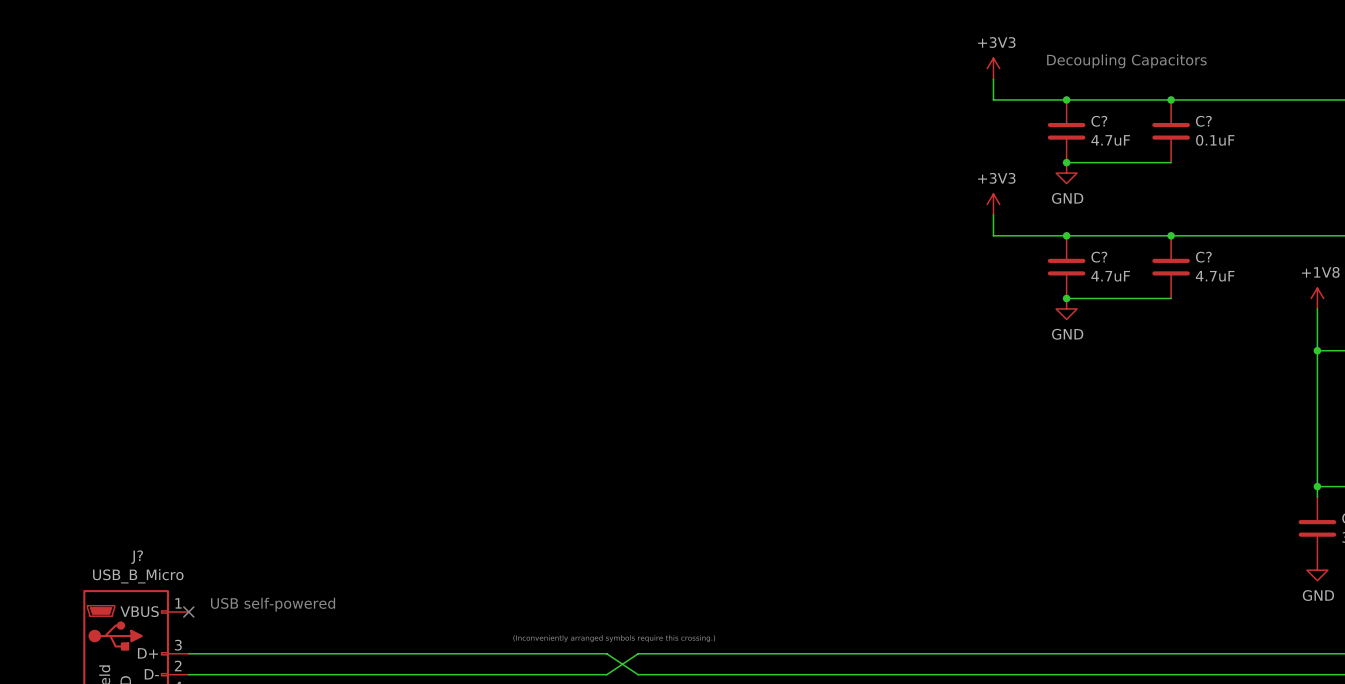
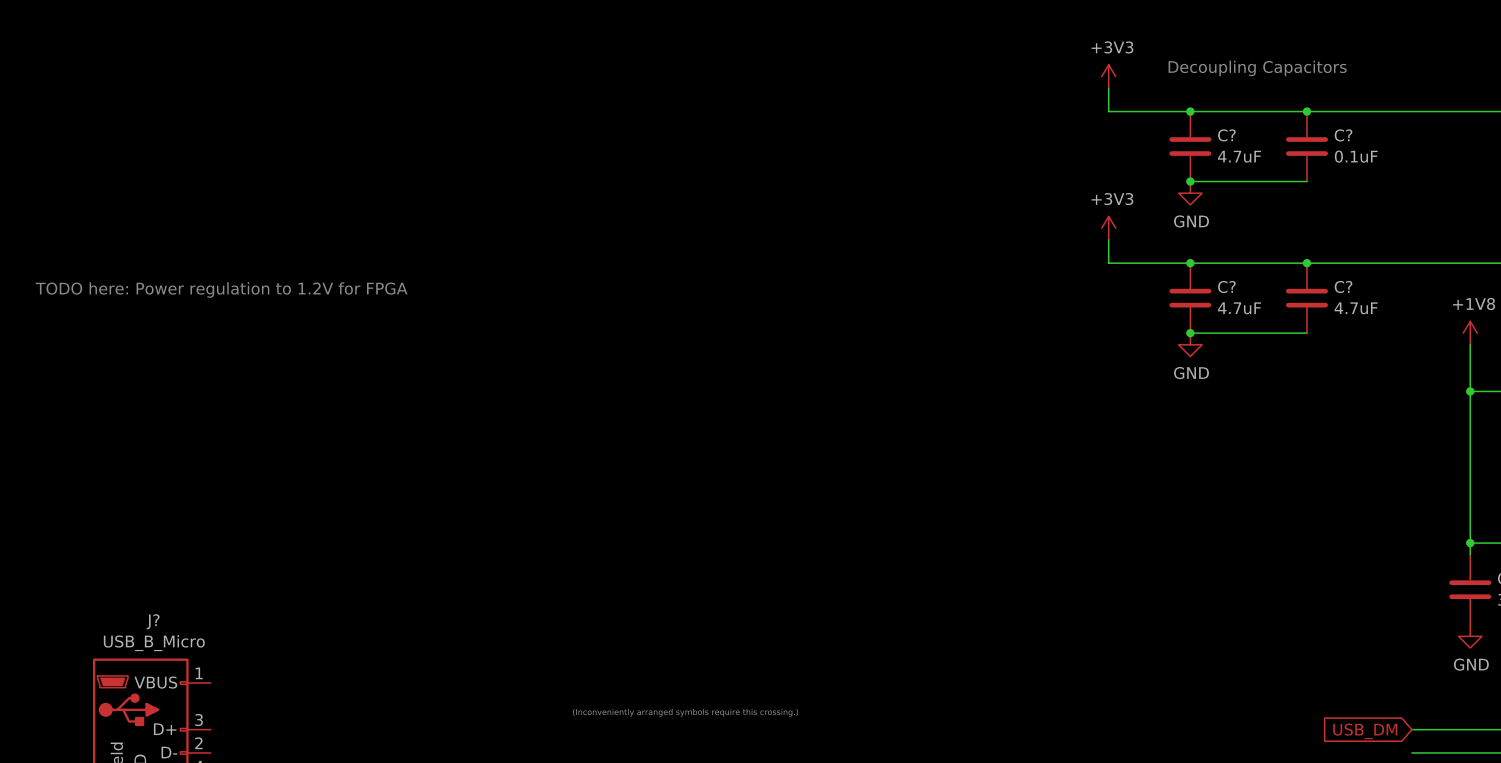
text: none -> TODO here: Power regulation to 1.2V for FPGA (221, 290)
text: USB self-powered (273, 604) -> none
no-connect mark: (188, 611) -> none
wire: (188, 653) (606, 653) (638, 674) (1265, 674) -> none
wire: (1265, 653) (638, 653) (606, 674) (188, 674) -> none
global label: none -> USB_DM (1365, 731)

